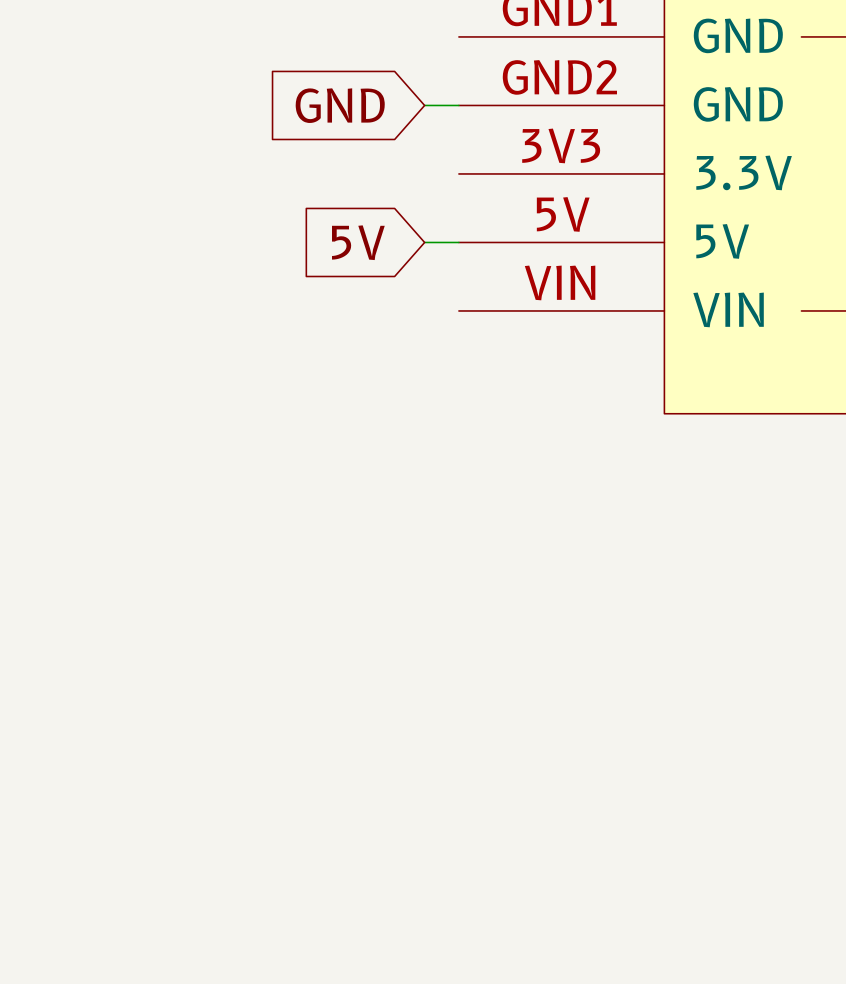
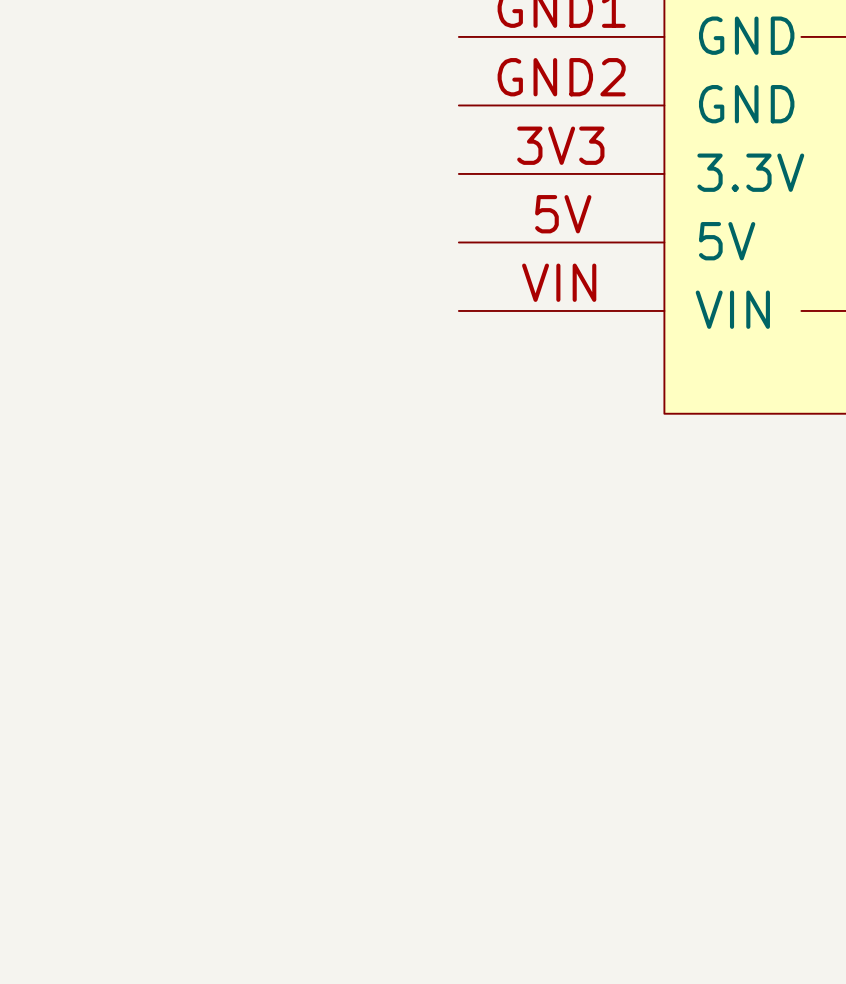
global label: GND (340, 105) -> none
wire: (424, 105) (458, 105) -> none
global label: 5V (358, 242) -> none
wire: (424, 242) (458, 242) -> none

